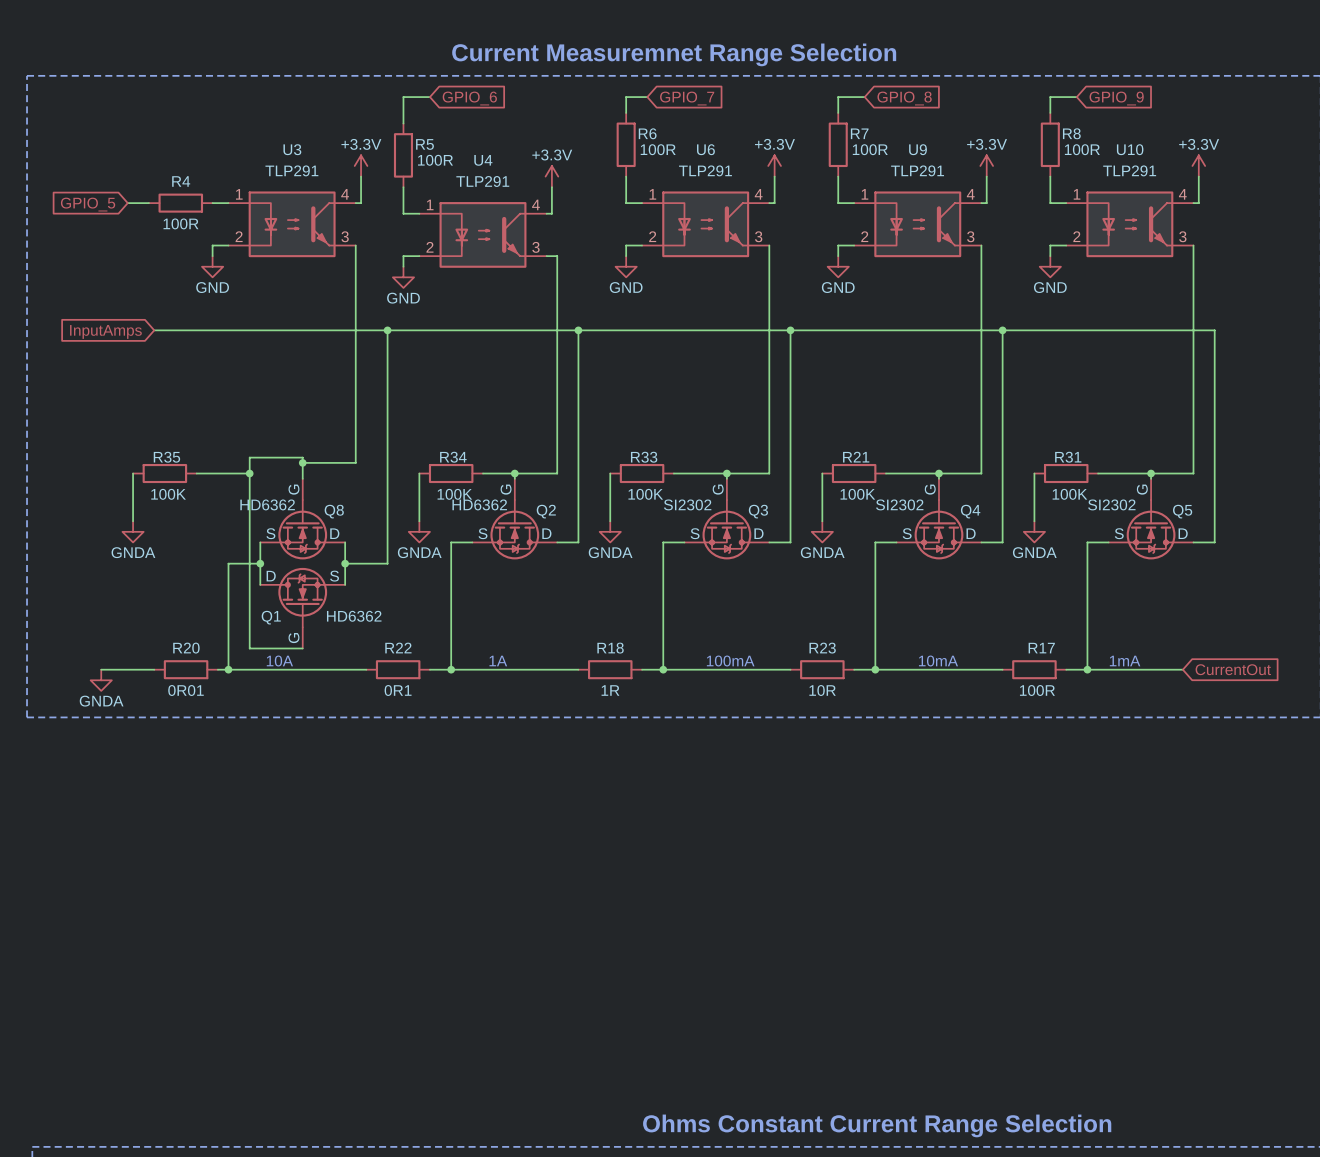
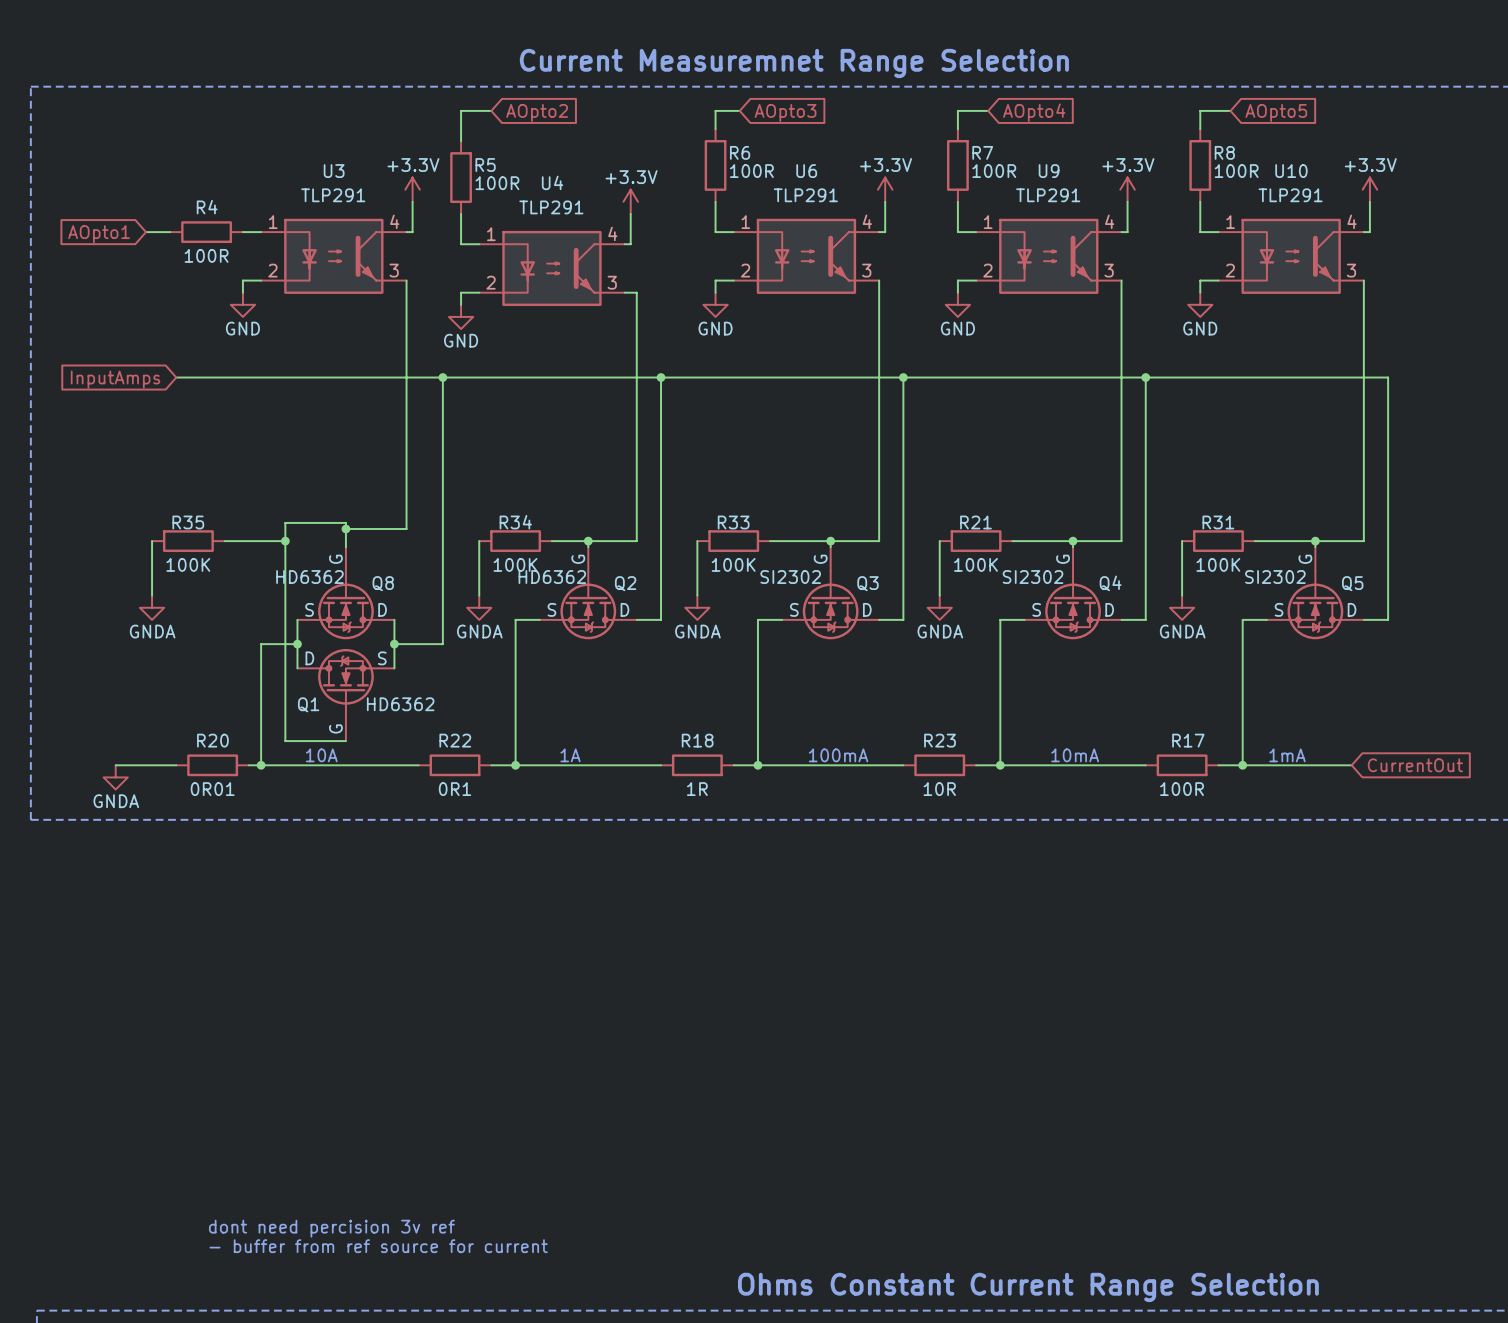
global label: GPIO_6 (469, 98) -> AOpto2 (537, 112)
global label: GPIO_7 (687, 98) -> AOpto3 (785, 112)
global label: GPIO_8 (904, 98) -> AOpto4 (1034, 112)
global label: GPIO_9 (1116, 98) -> AOpto5 (1276, 112)
global label: GPIO_5 (88, 204) -> AOpto1 (99, 234)
text: none -> dont need percision 3v ref (331, 1228)
text: none -> - buffer from ref source for current (378, 1246)

